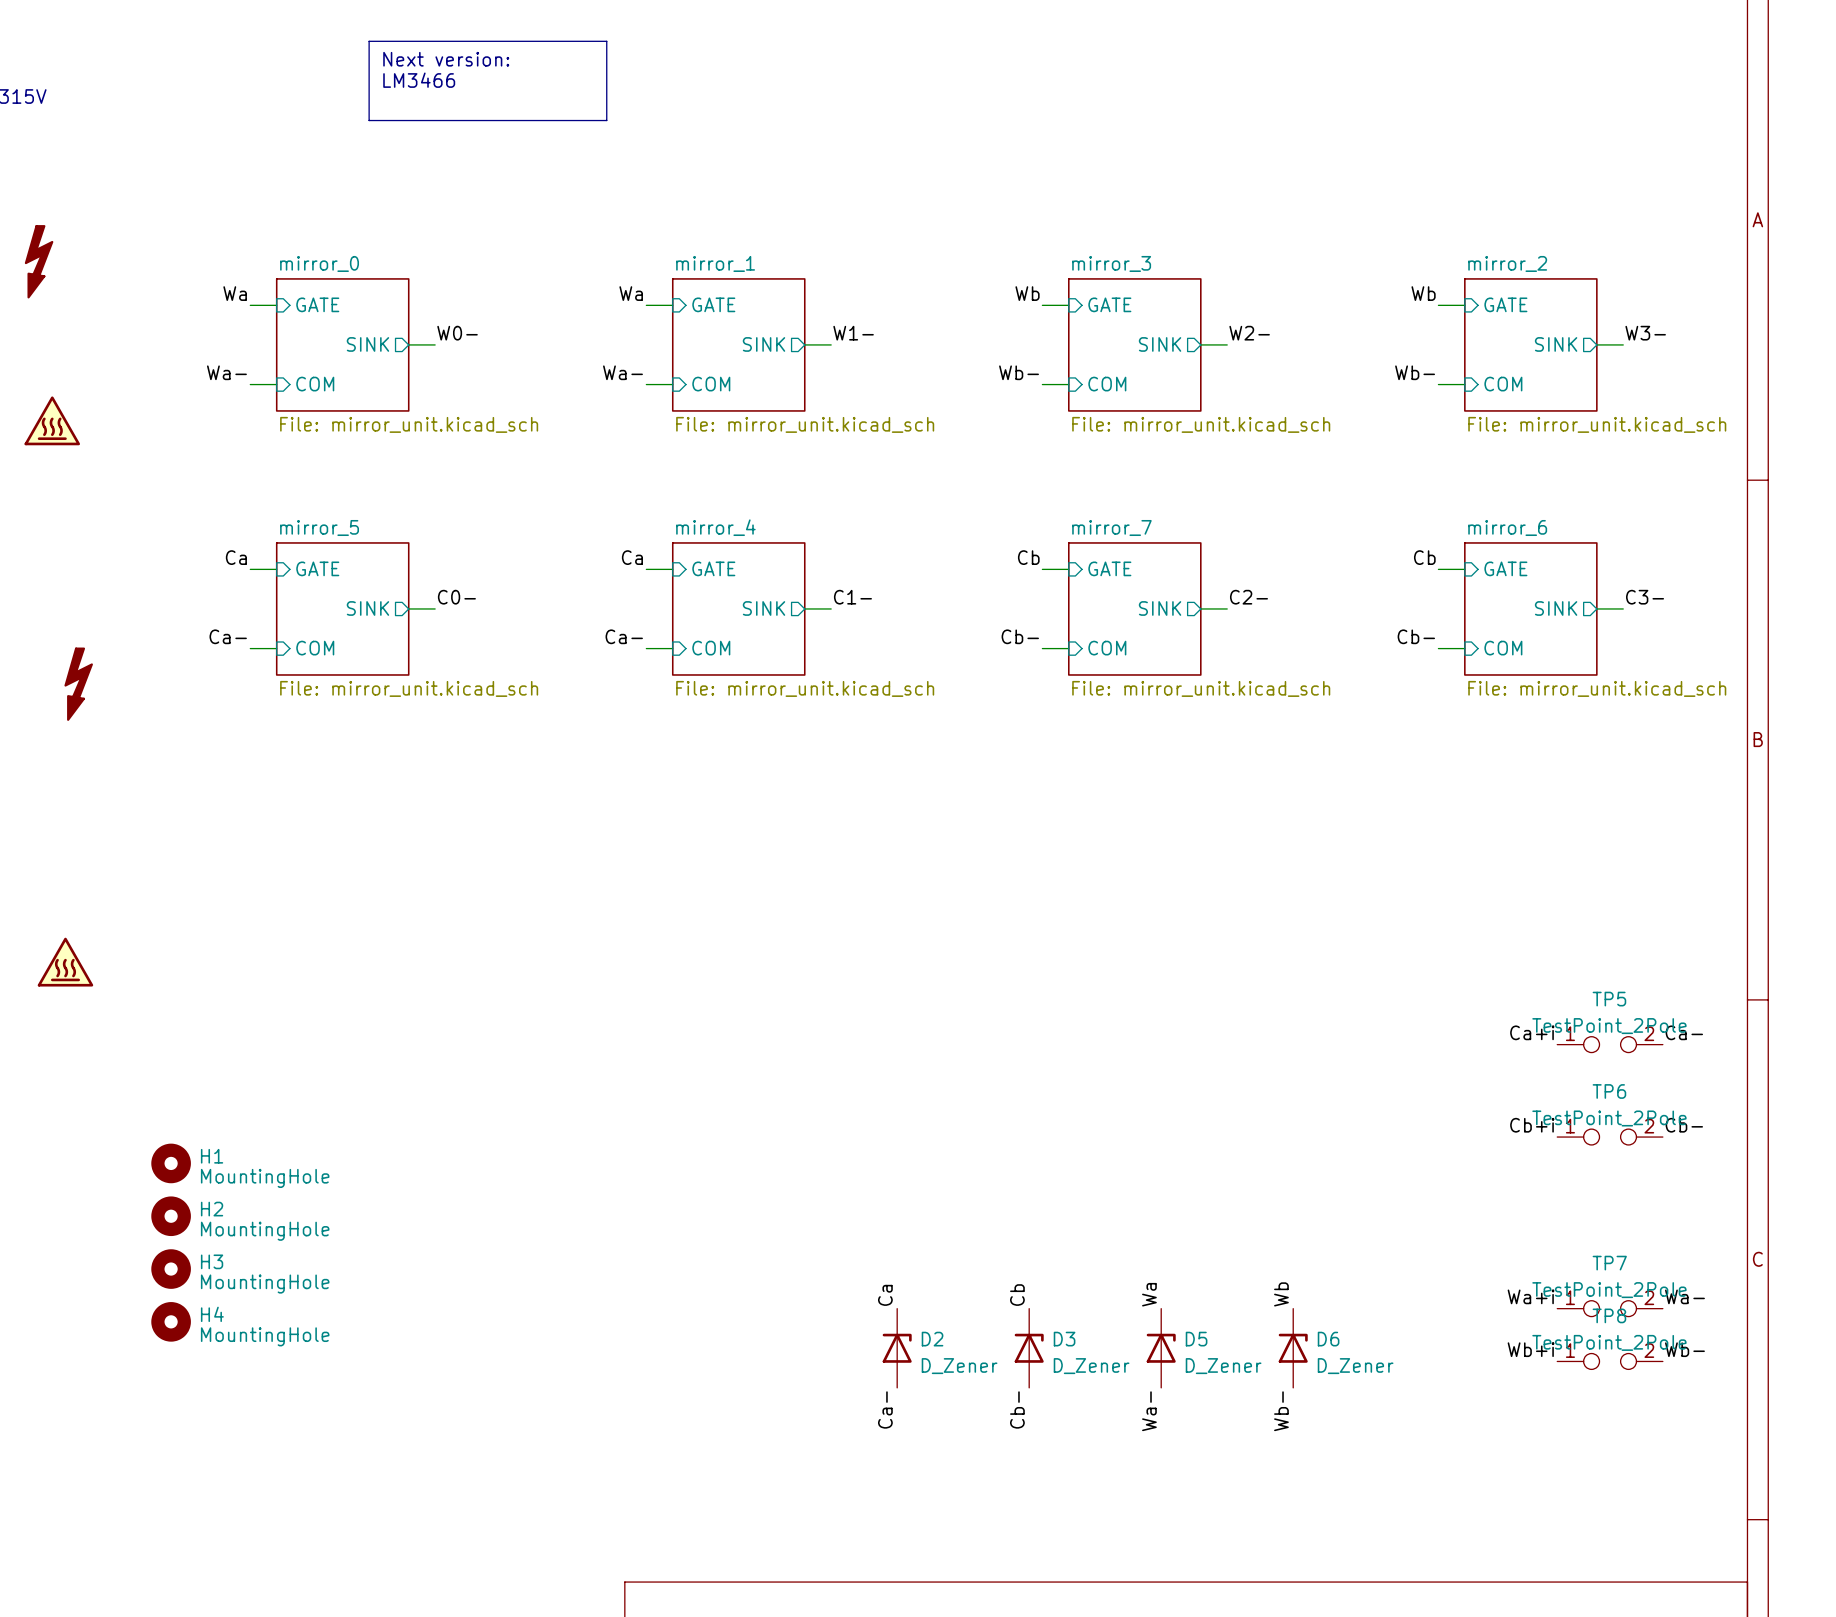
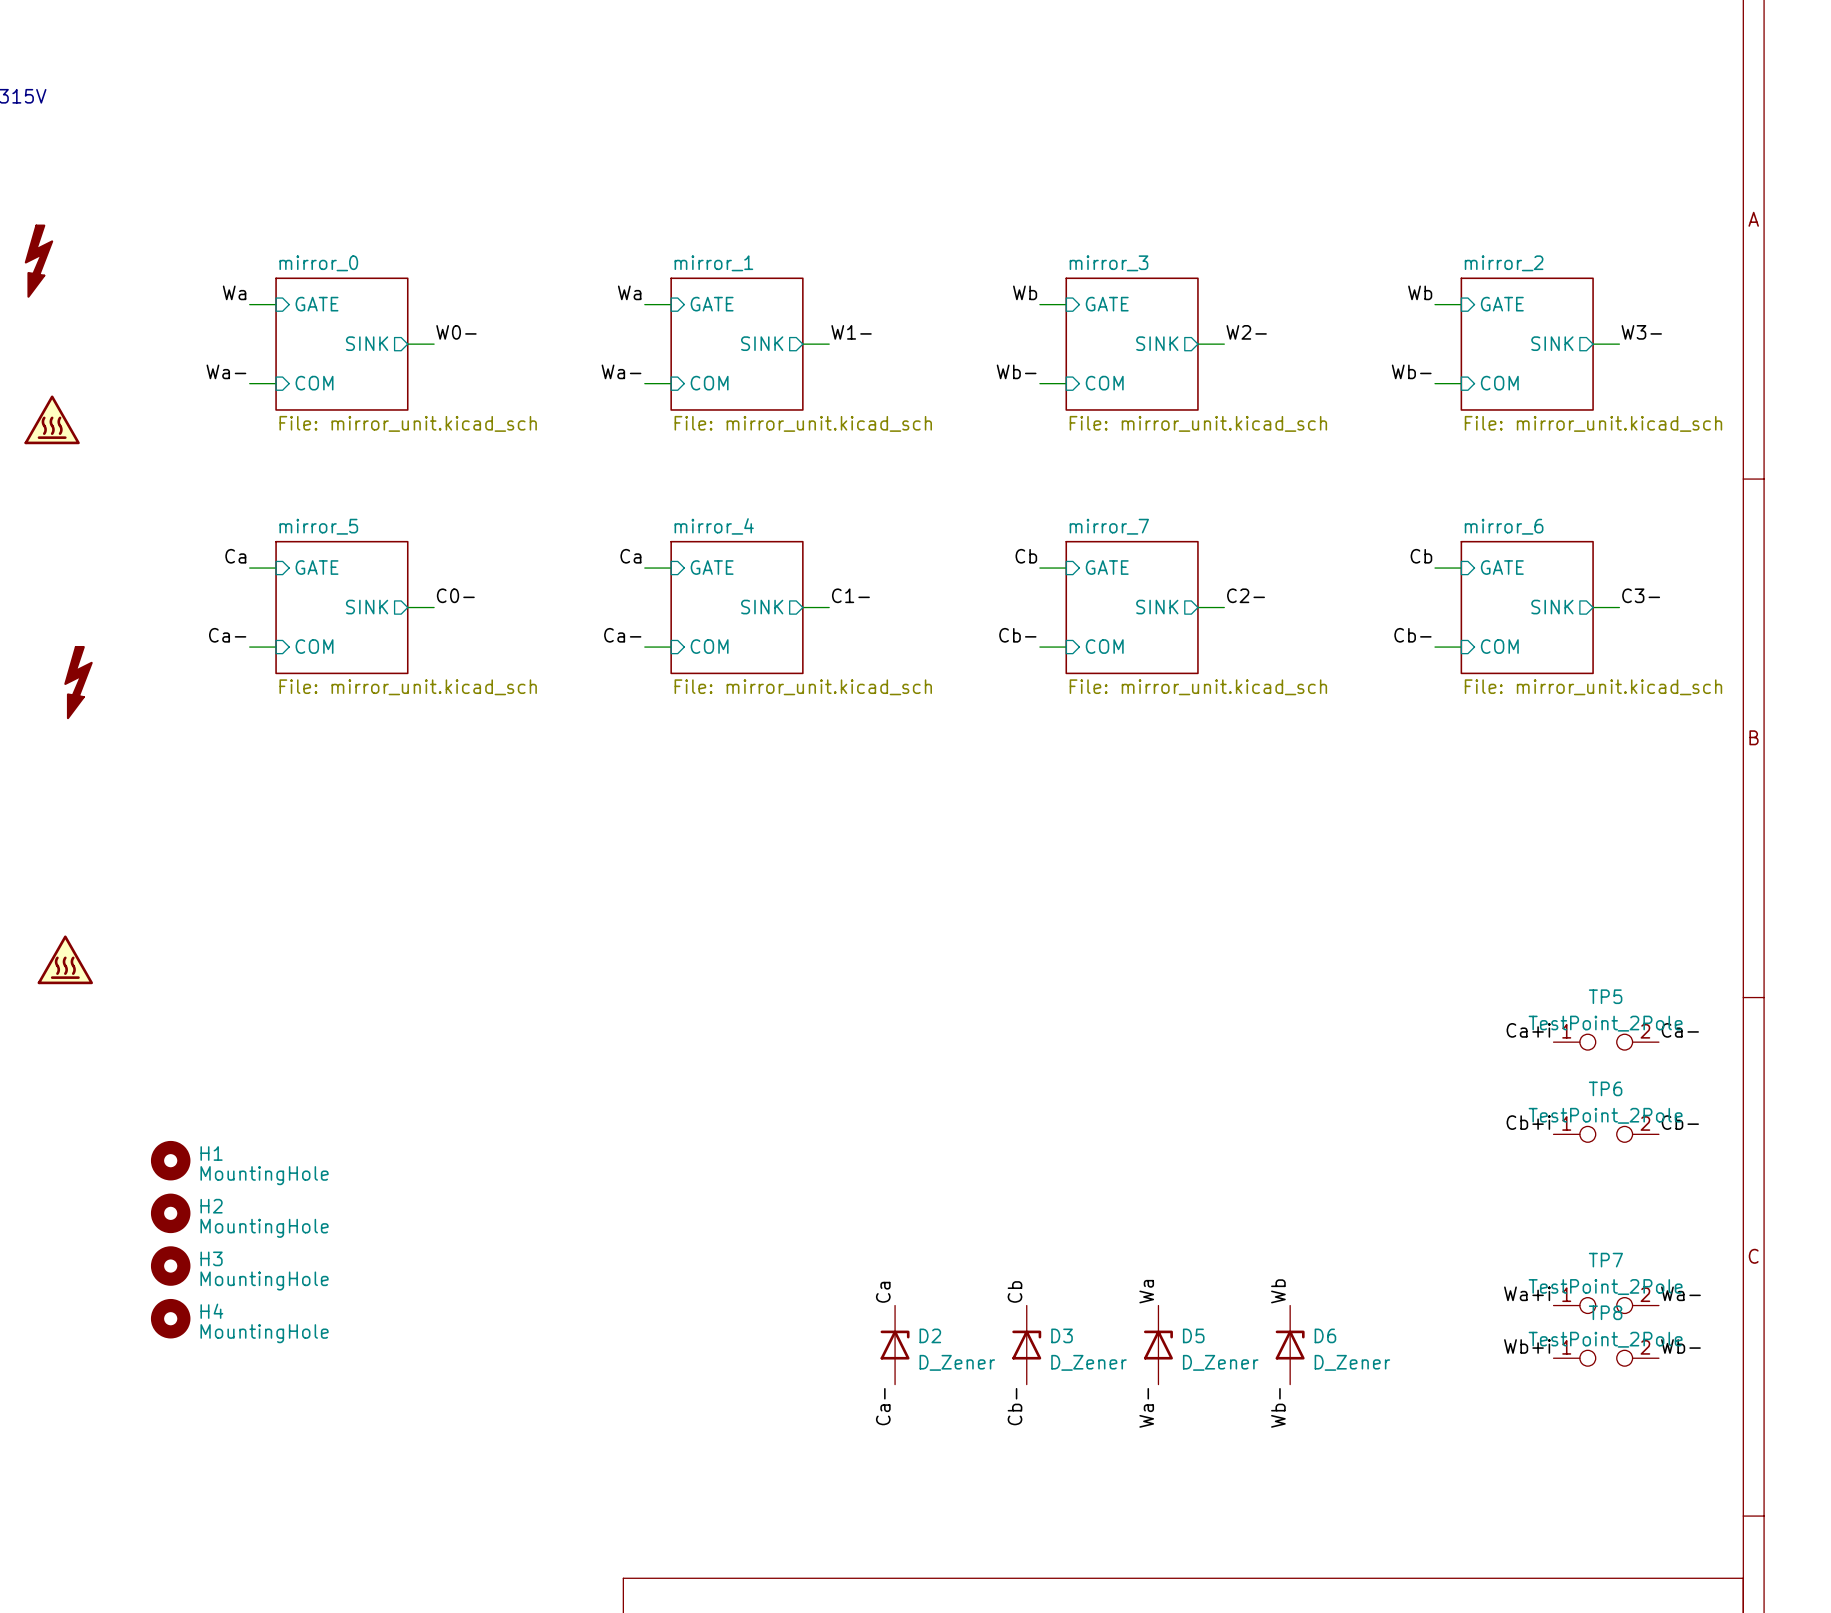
line: (369, 41) (606, 41) (606, 120) (369, 120) (369, 41) -> none
text: Next version: (446, 59) -> none
text: LM3466 (419, 80) -> none

